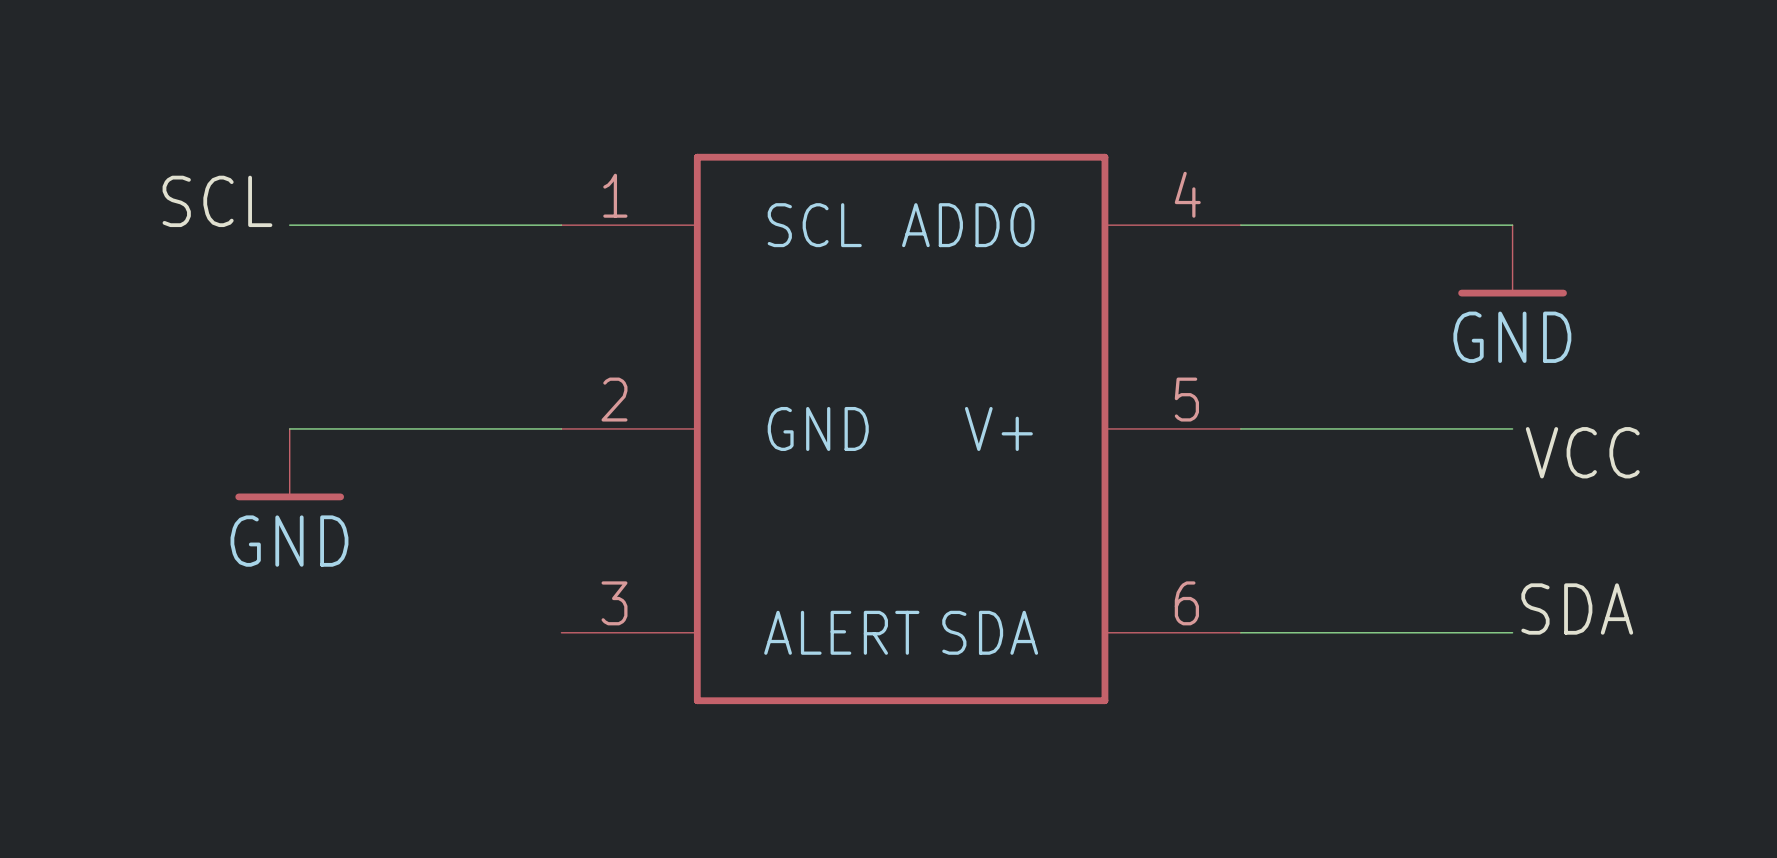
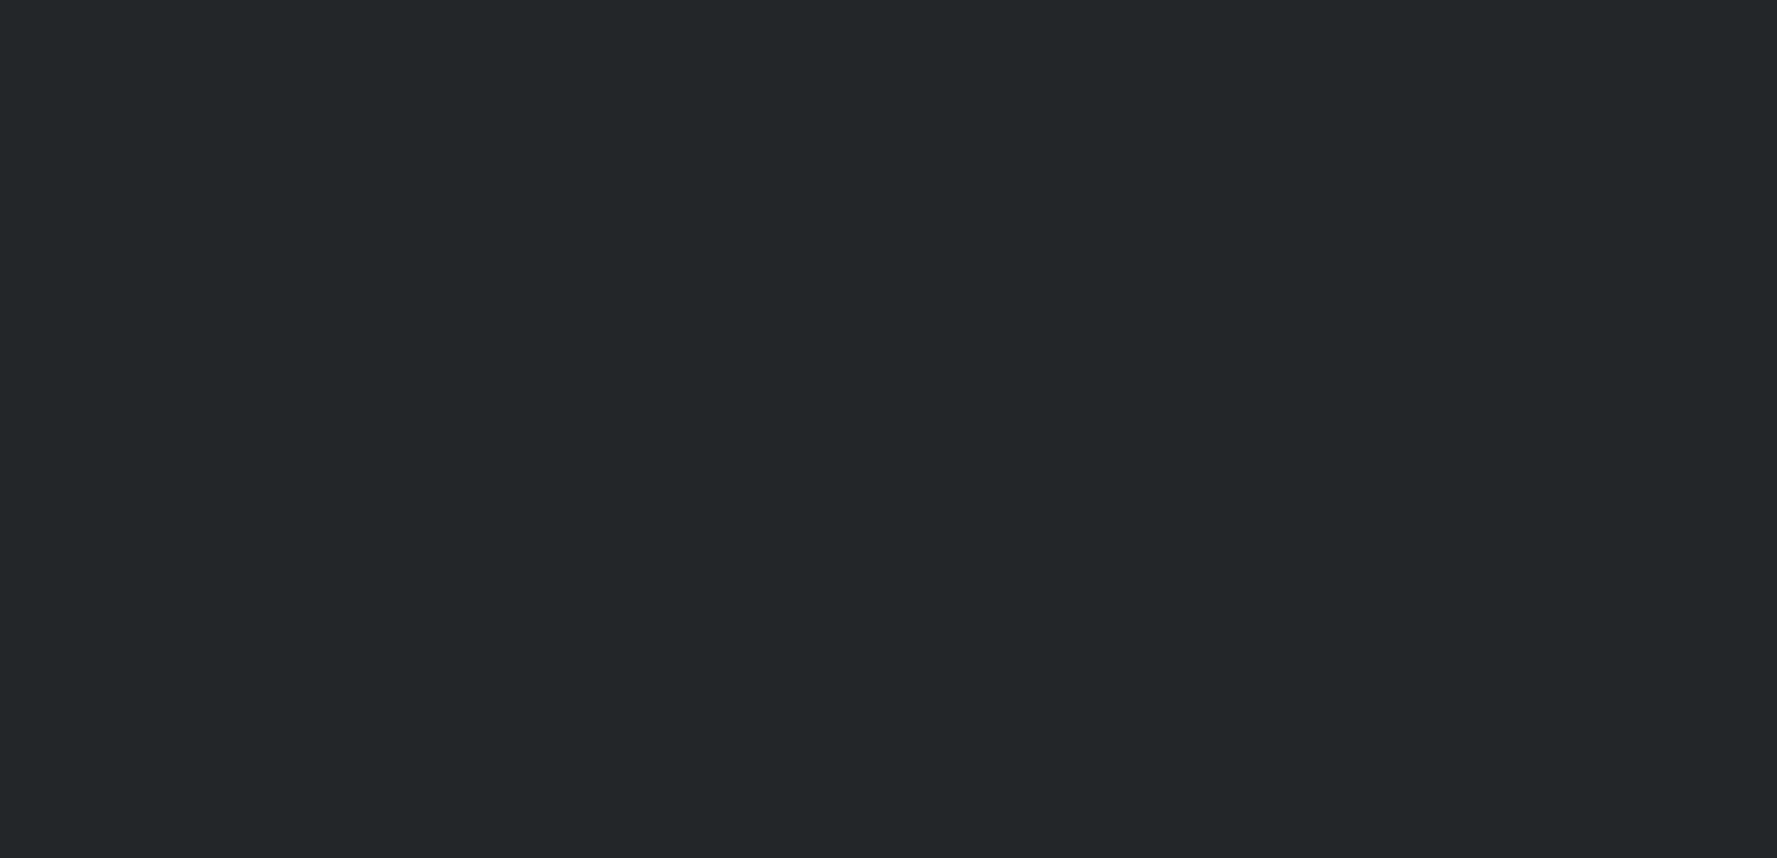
label: SCL (217, 201) -> none
wire: (289, 225) (561, 225) -> none
wire: (1240, 225) (1512, 225) -> none
power symbol: GND (1512, 260) -> none
wire: (289, 428) (561, 428) -> none
part: (901, 428) -> none
wire: (1240, 428) (1512, 428) -> none
label: VCC (1582, 452) -> none
power symbol: GND (289, 464) -> none
label: SDA (1577, 609) -> none
wire: (1240, 632) (1512, 632) -> none

